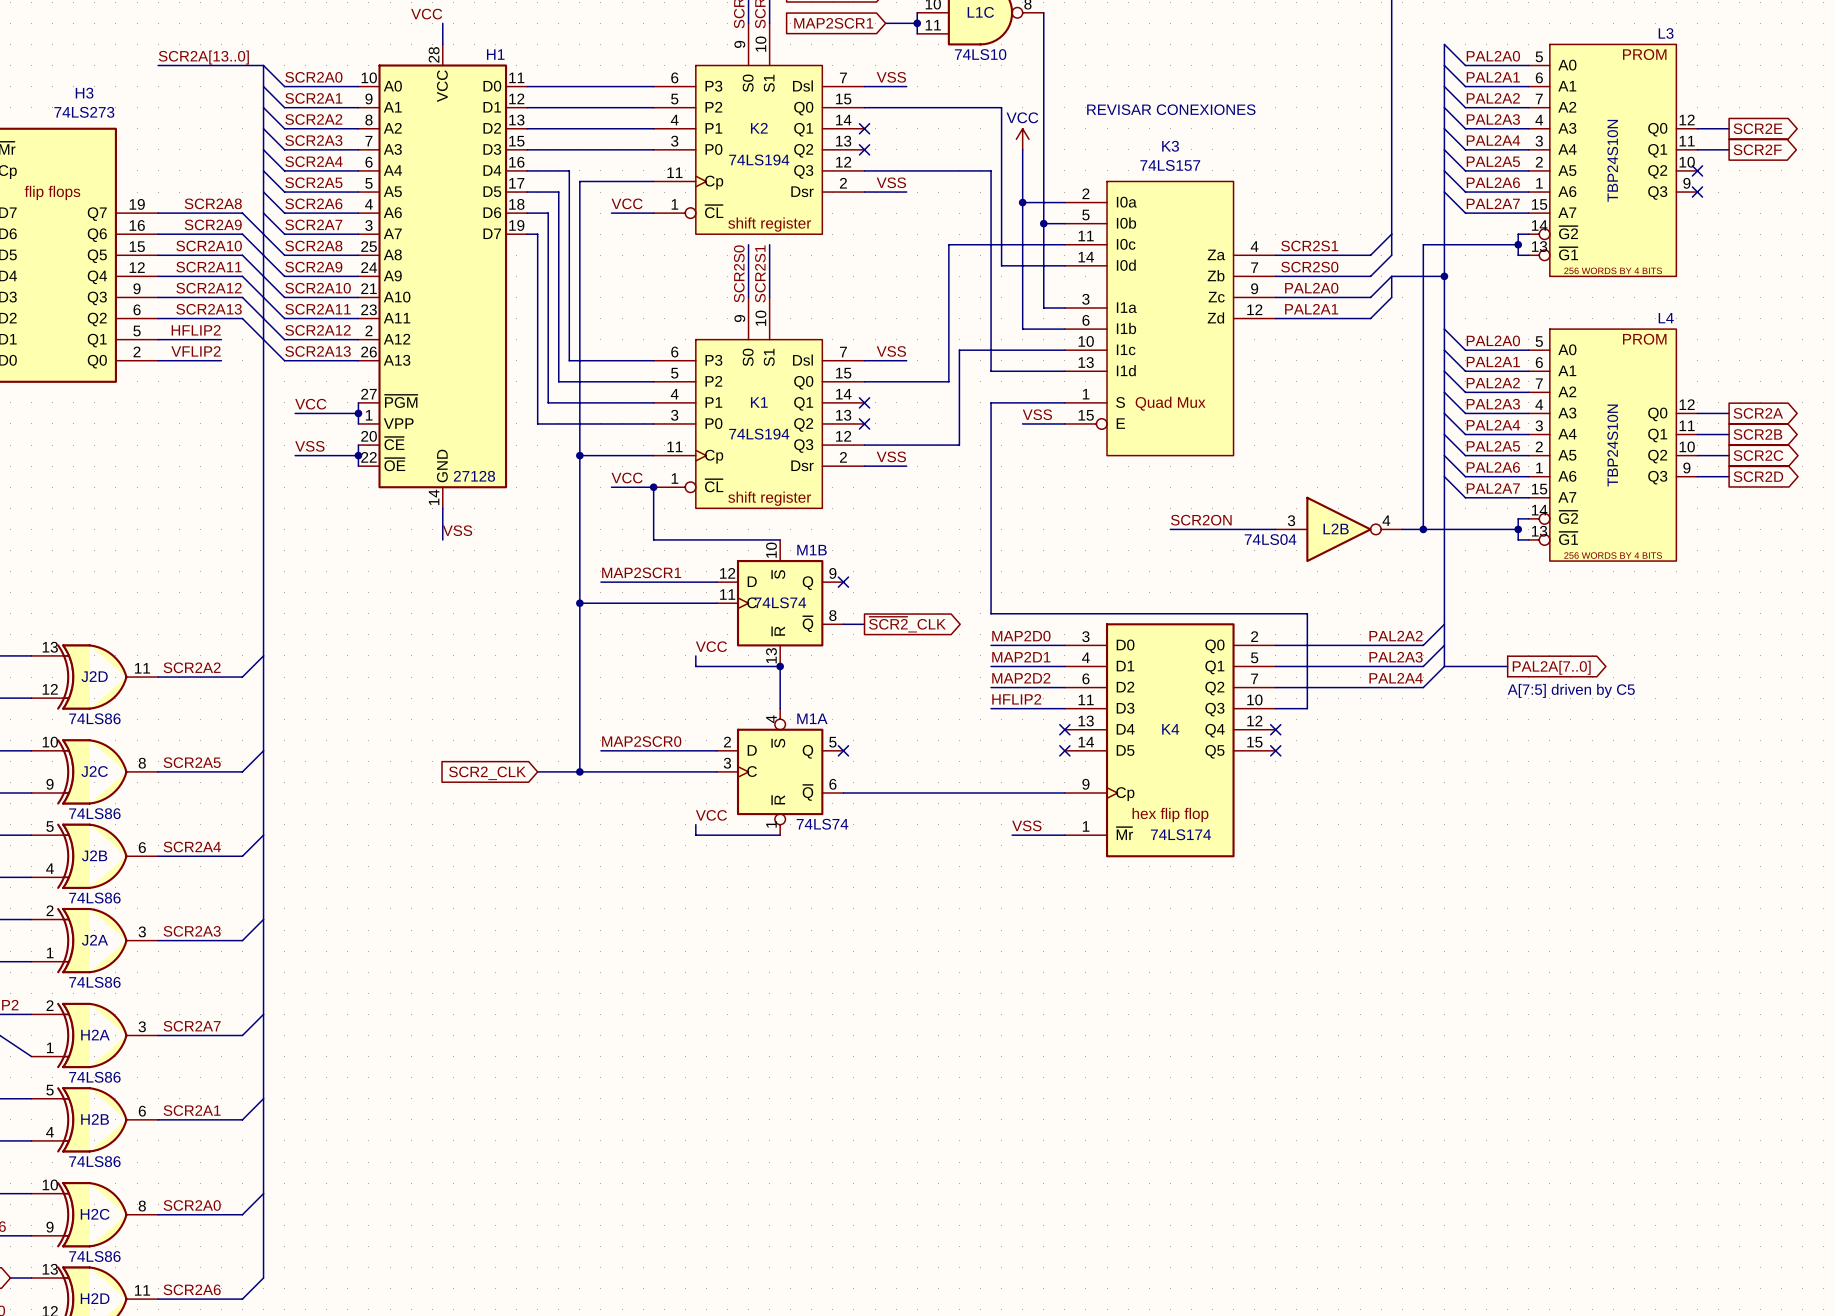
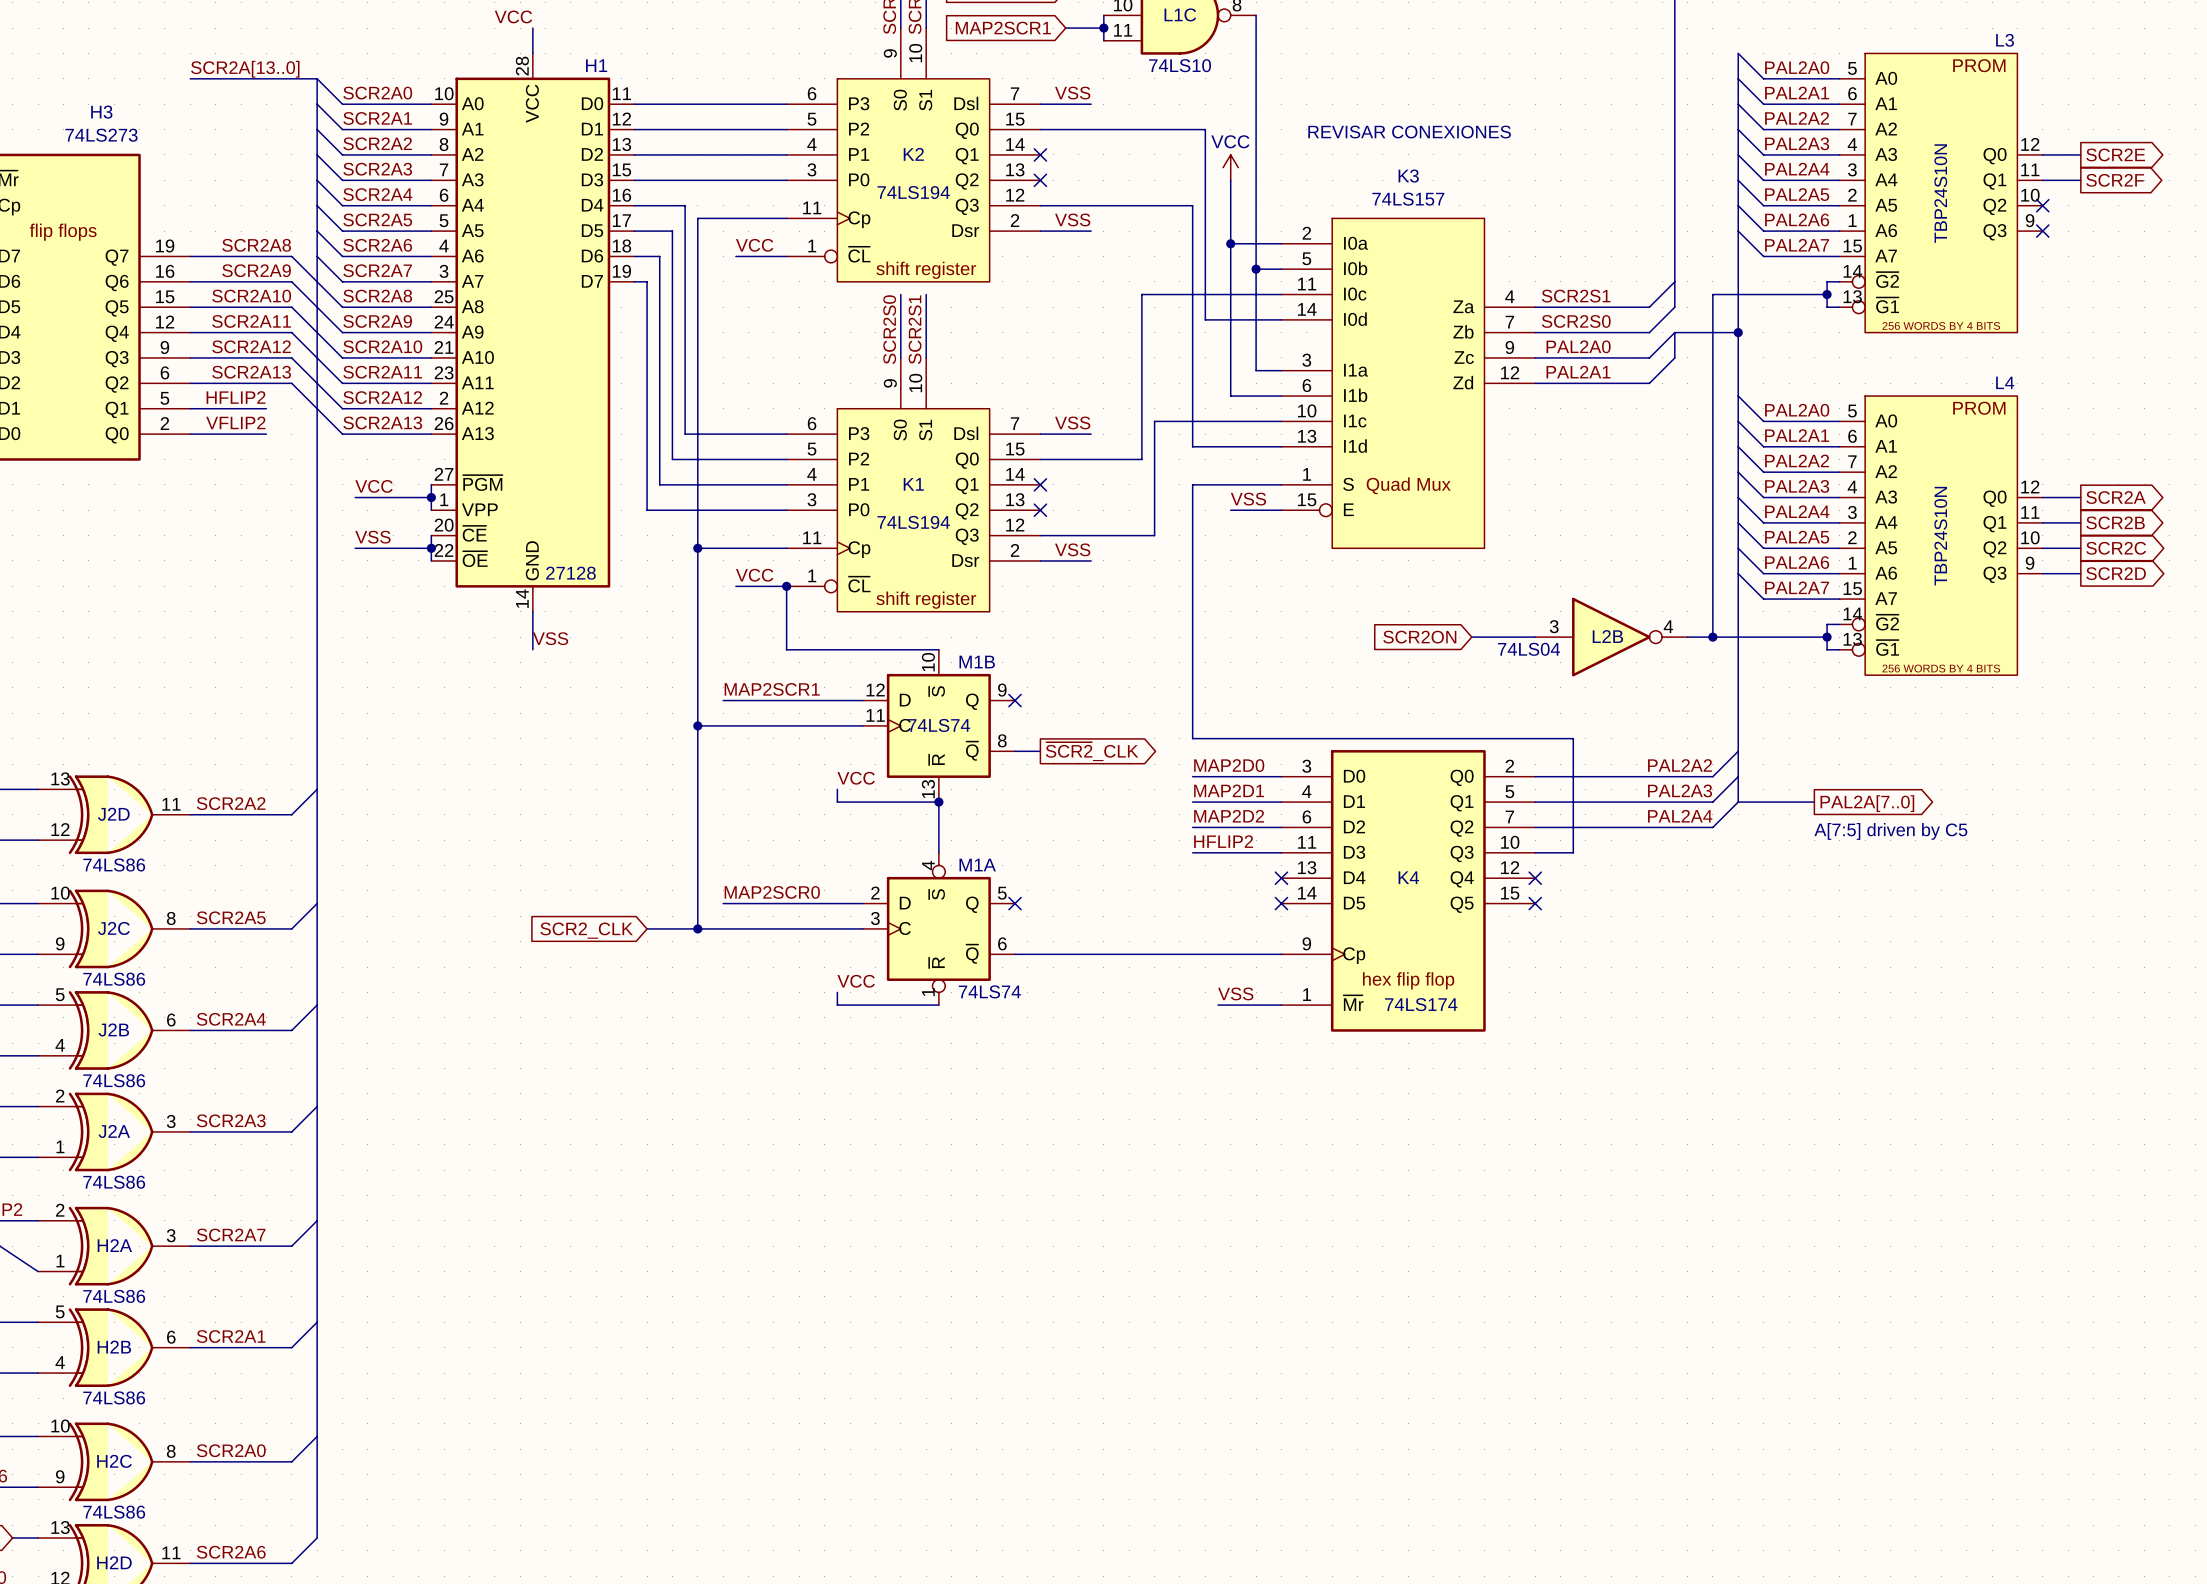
label: SCR2ON (1201, 520) -> none
wire: (1170, 529) (1223, 529) -> none
global label: none -> SCR2ON (1419, 637)

